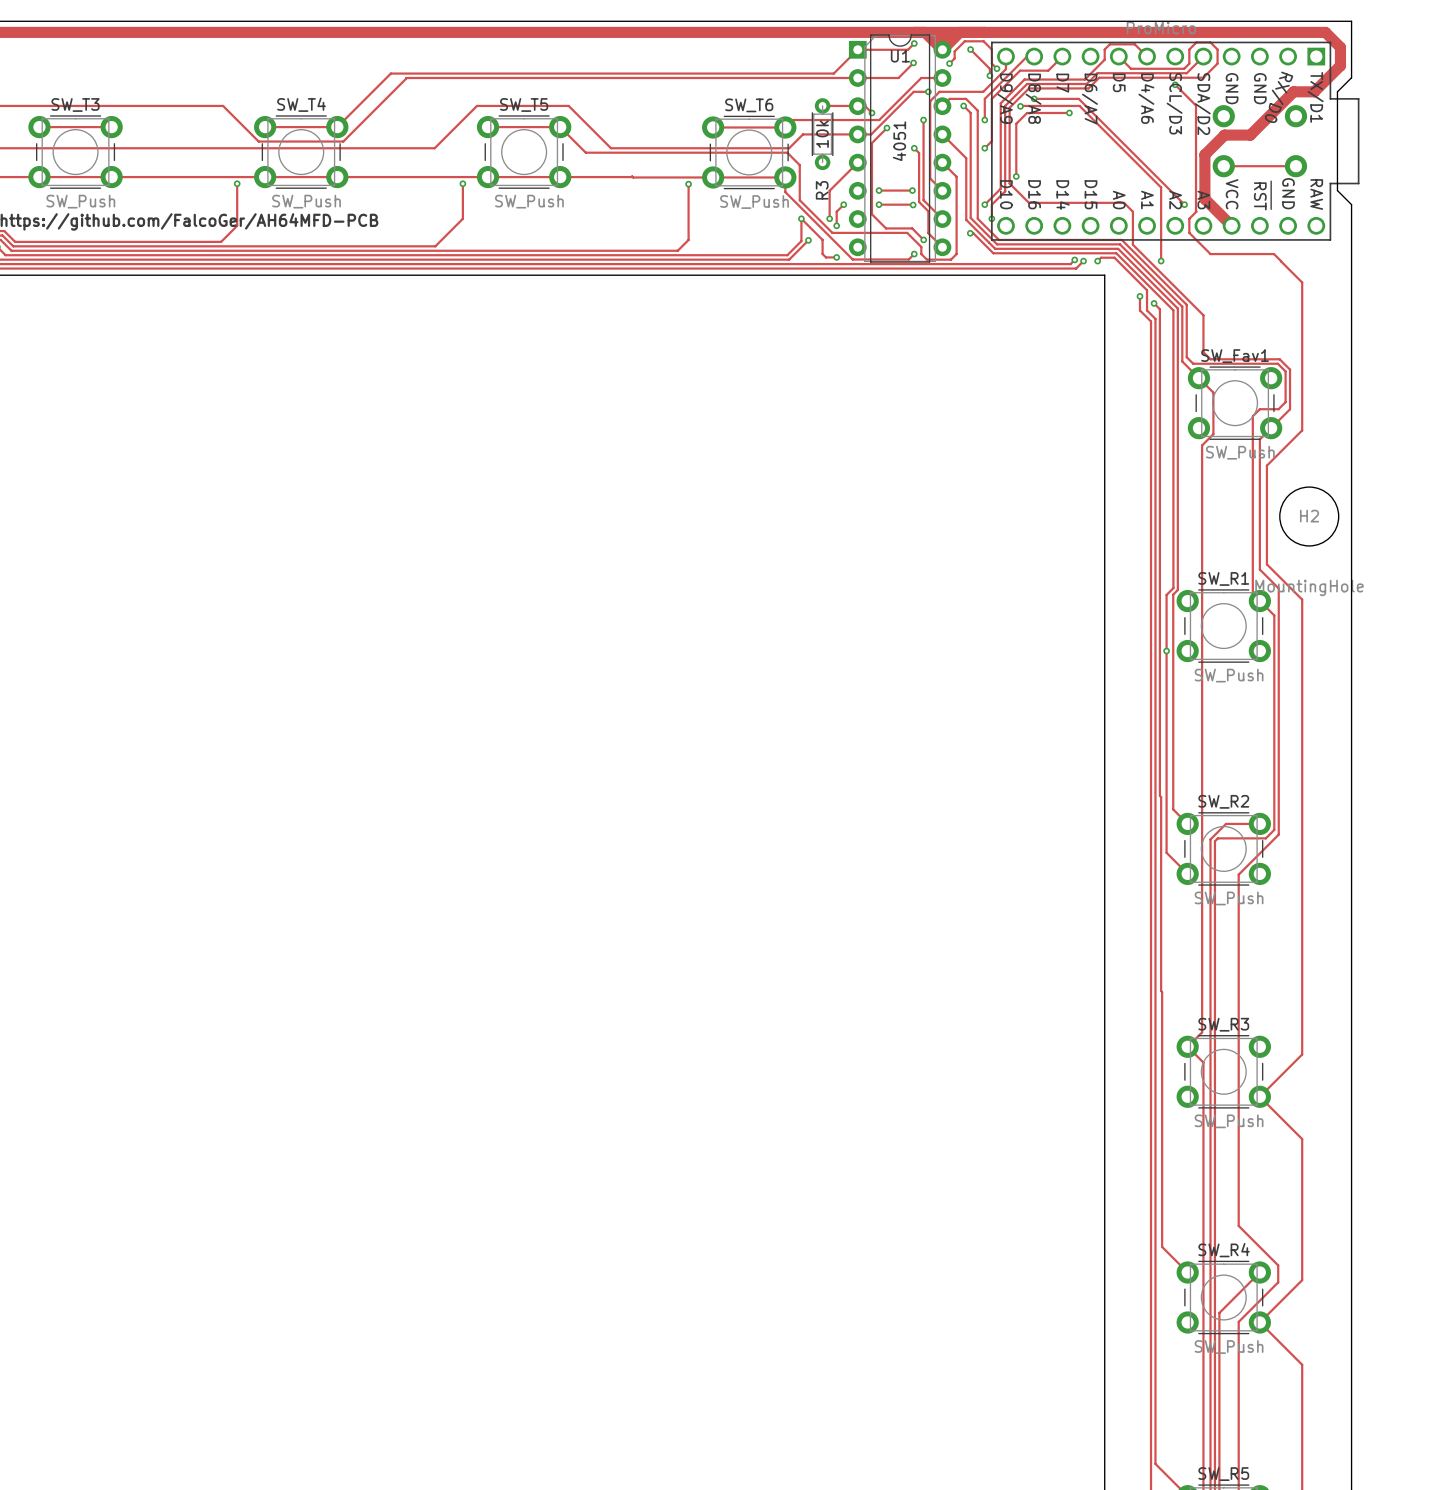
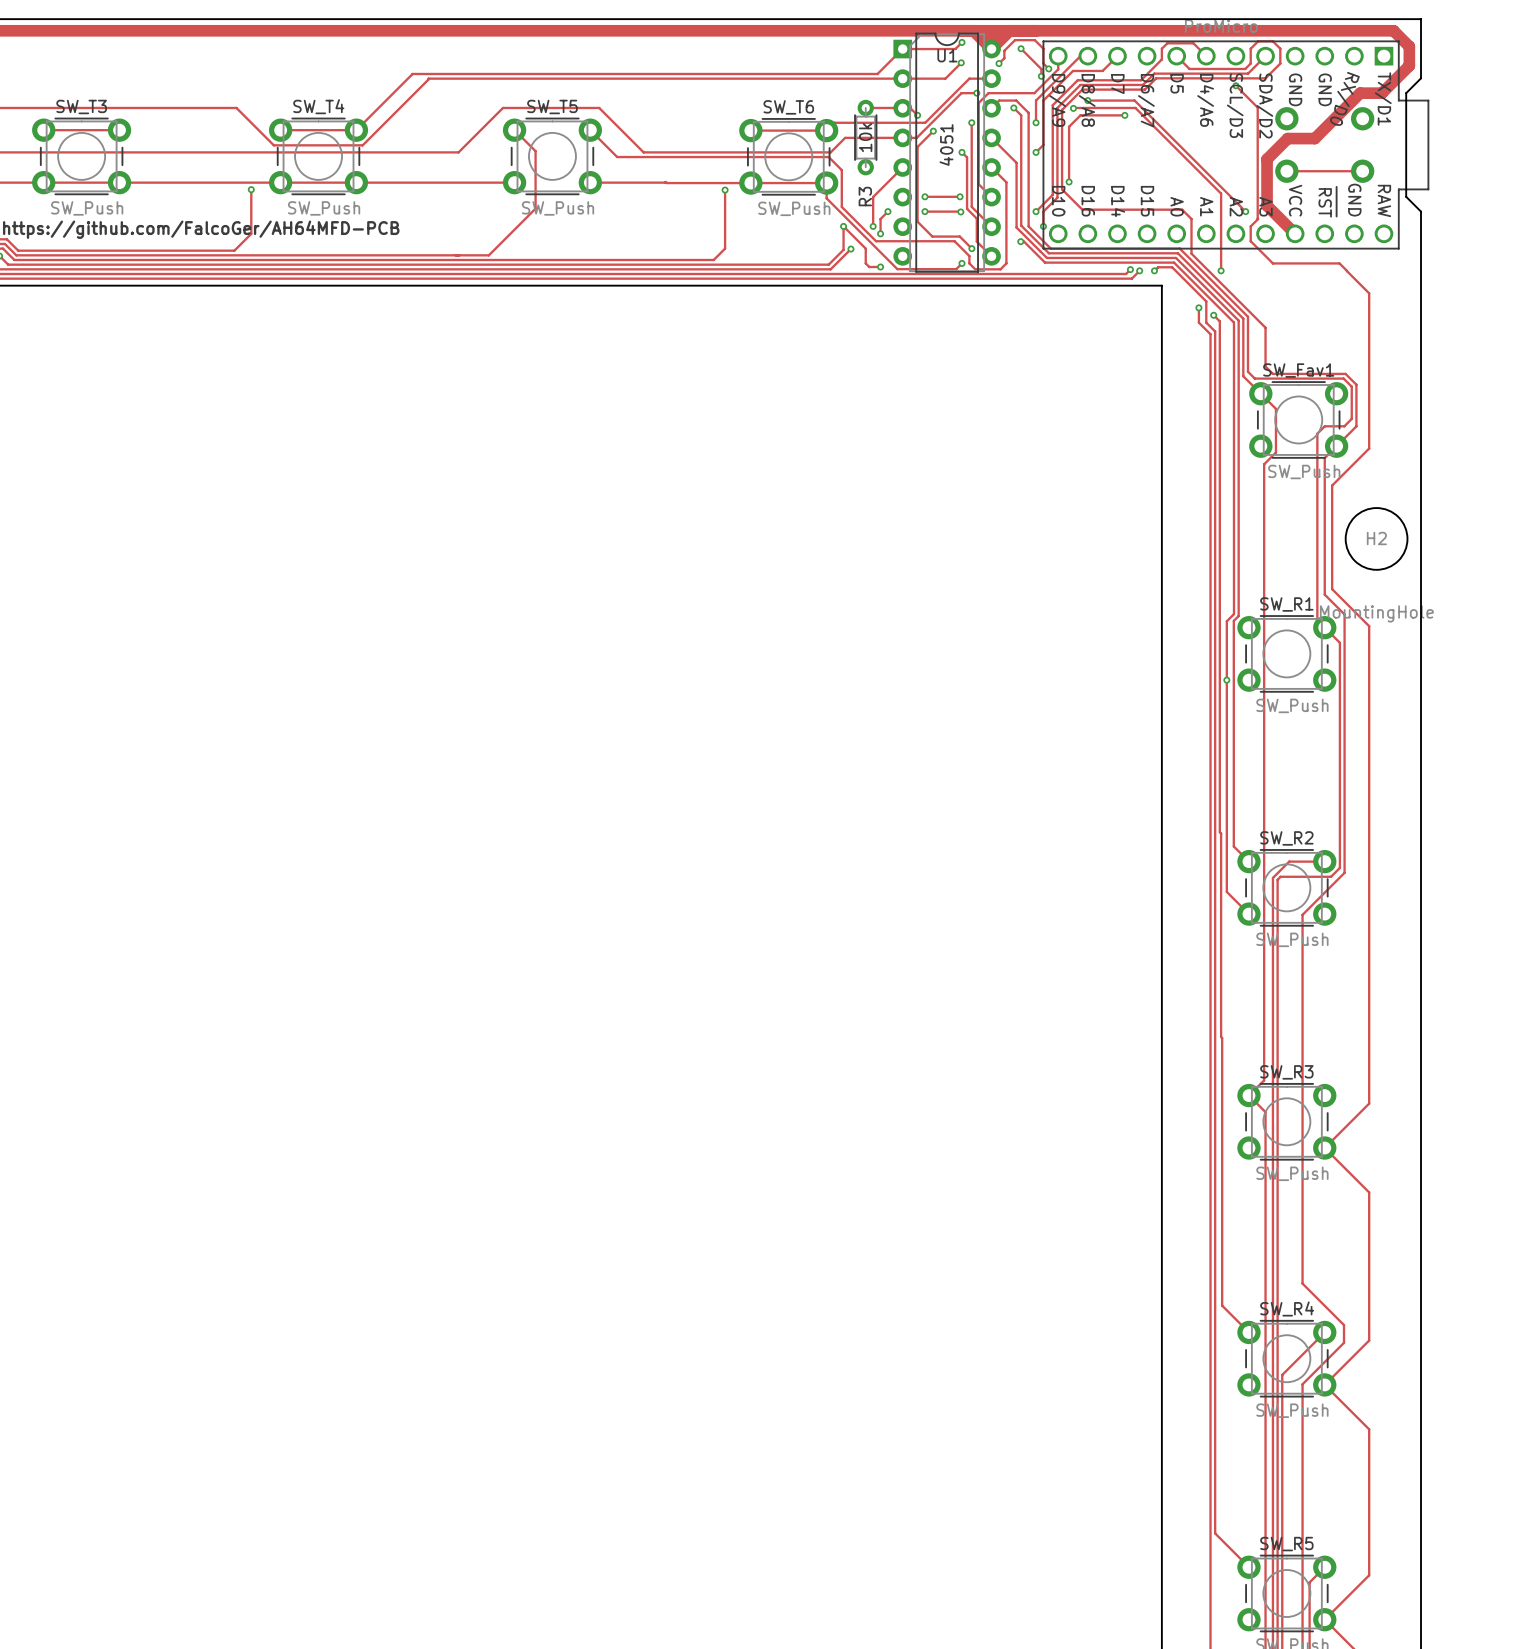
track: (488, 127) (560, 127) -> none
track: (488, 177) (560, 177) -> none
track: (462, 183) (462, 218) (435, 246) -> (514, 130) (535, 151) (535, 208) (488, 255) (459, 255)
via: (462, 183) -> none

